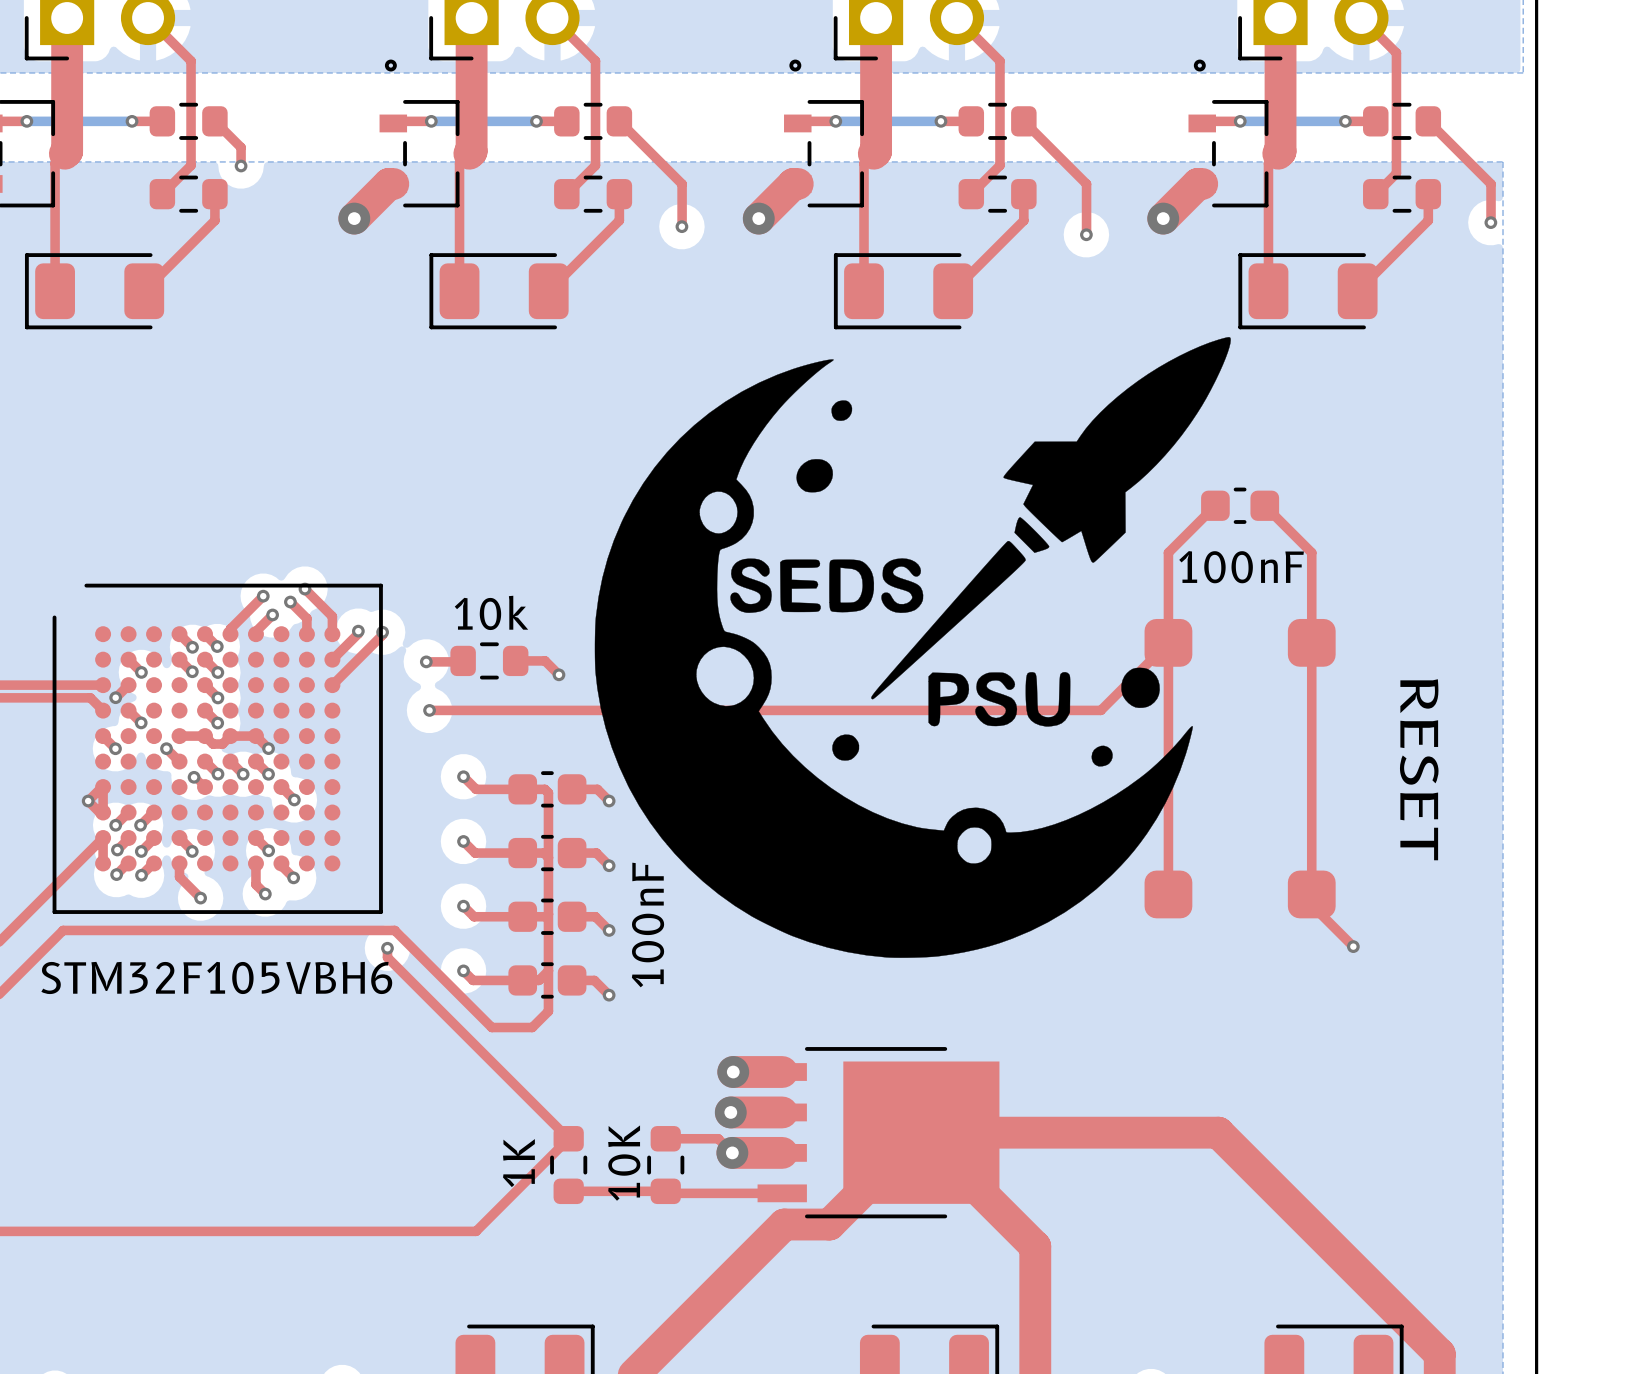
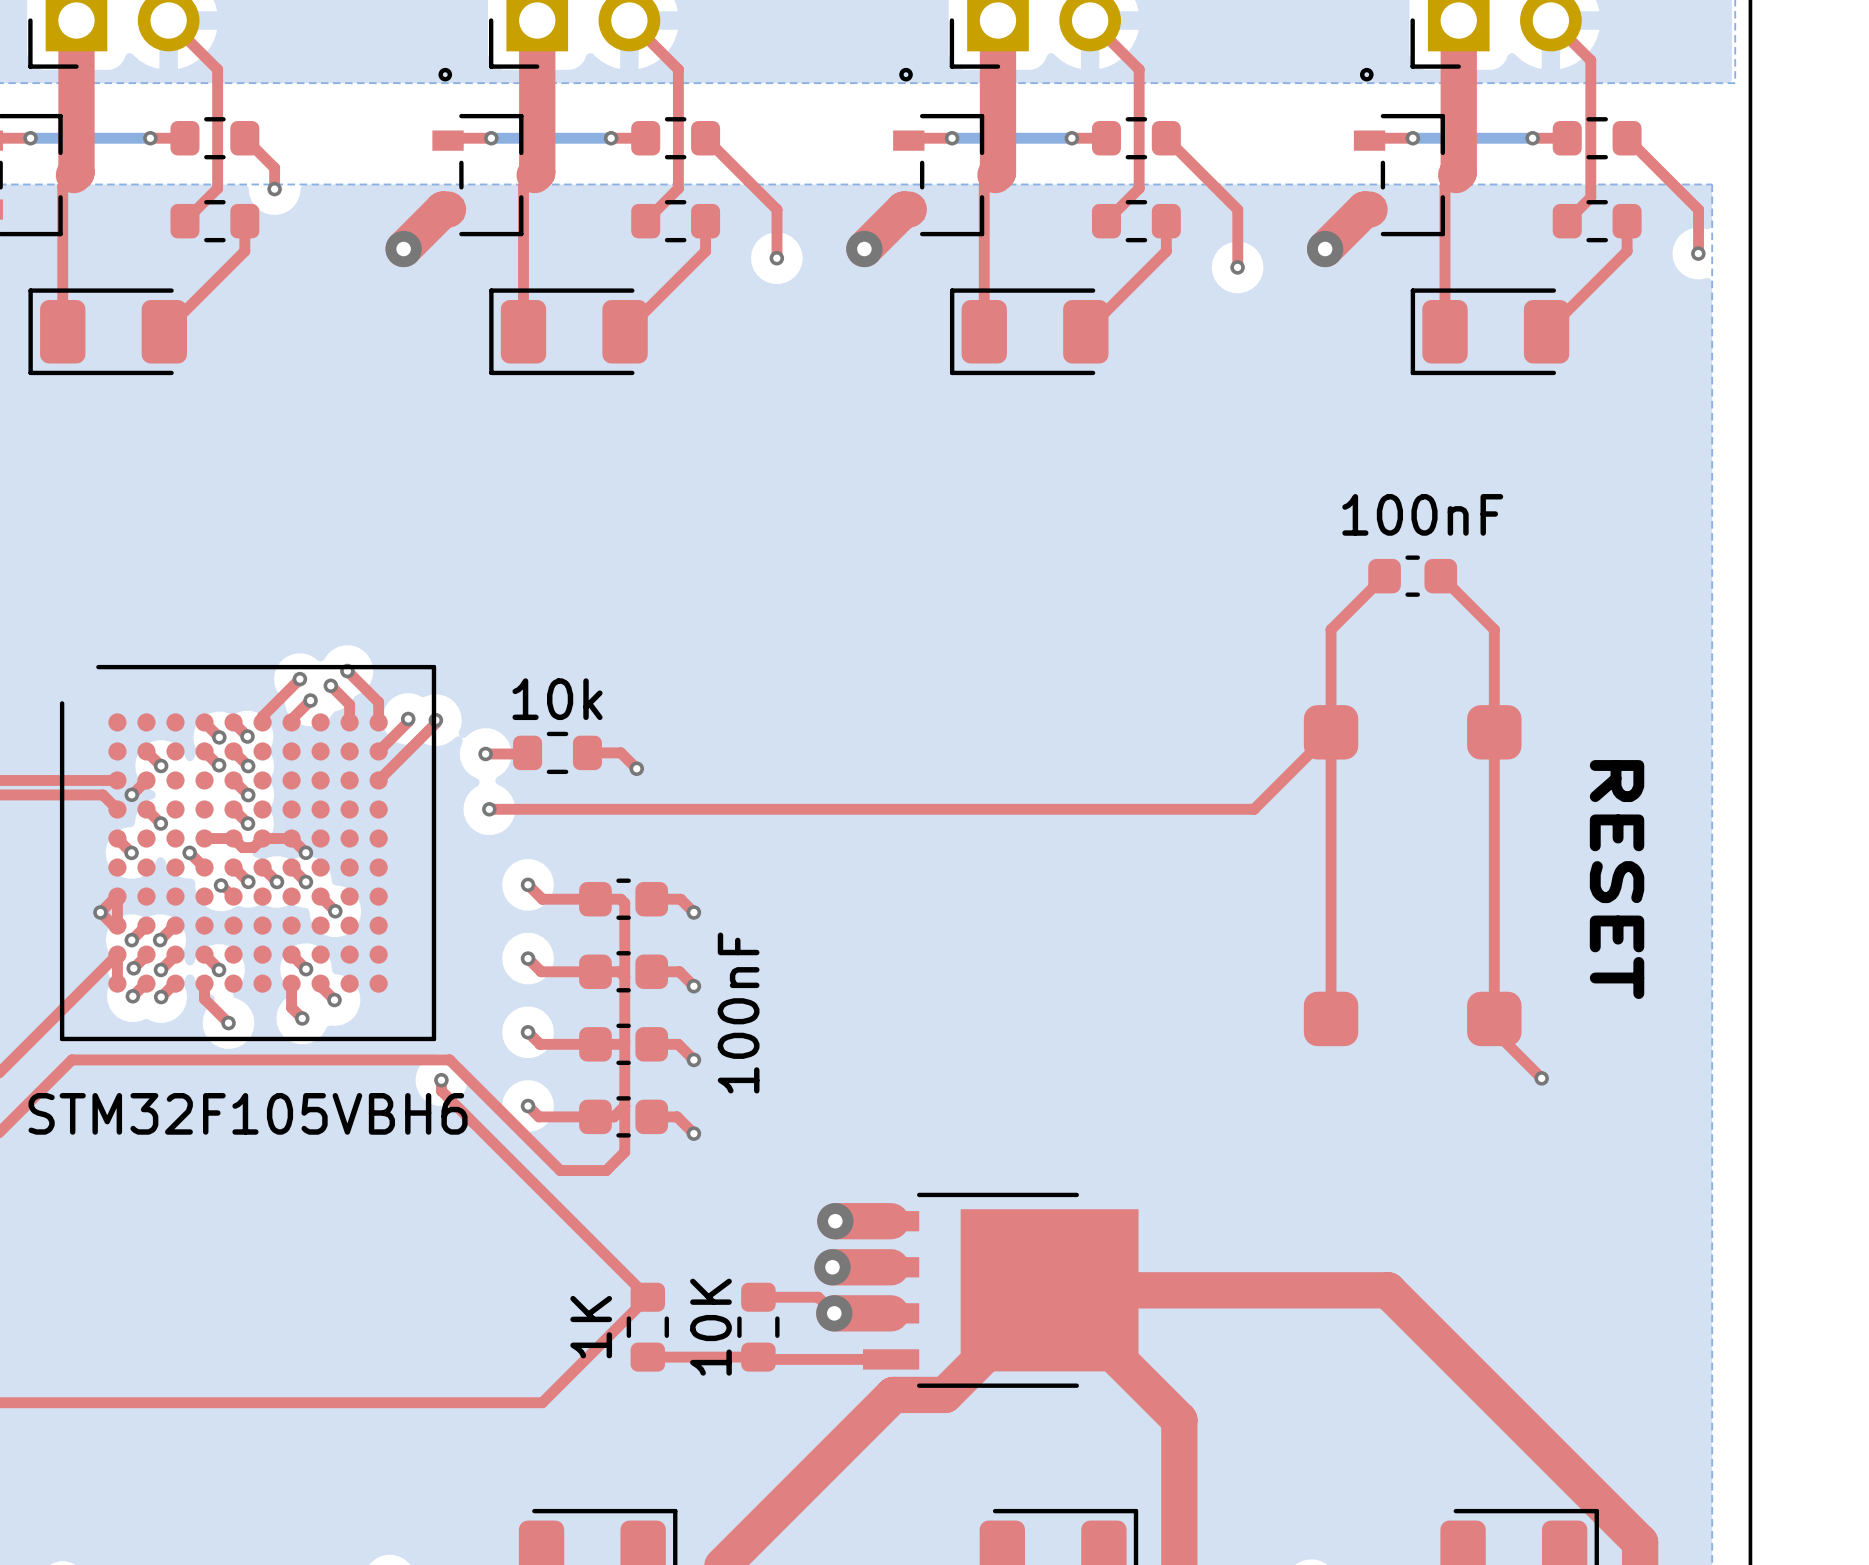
drawing: [594, 337, 1231, 958] -> none
part value position: 100nF (1241, 567) -> 100nF (1422, 514)
part value position: 100nF (648, 925) -> 100nF (738, 1012)

